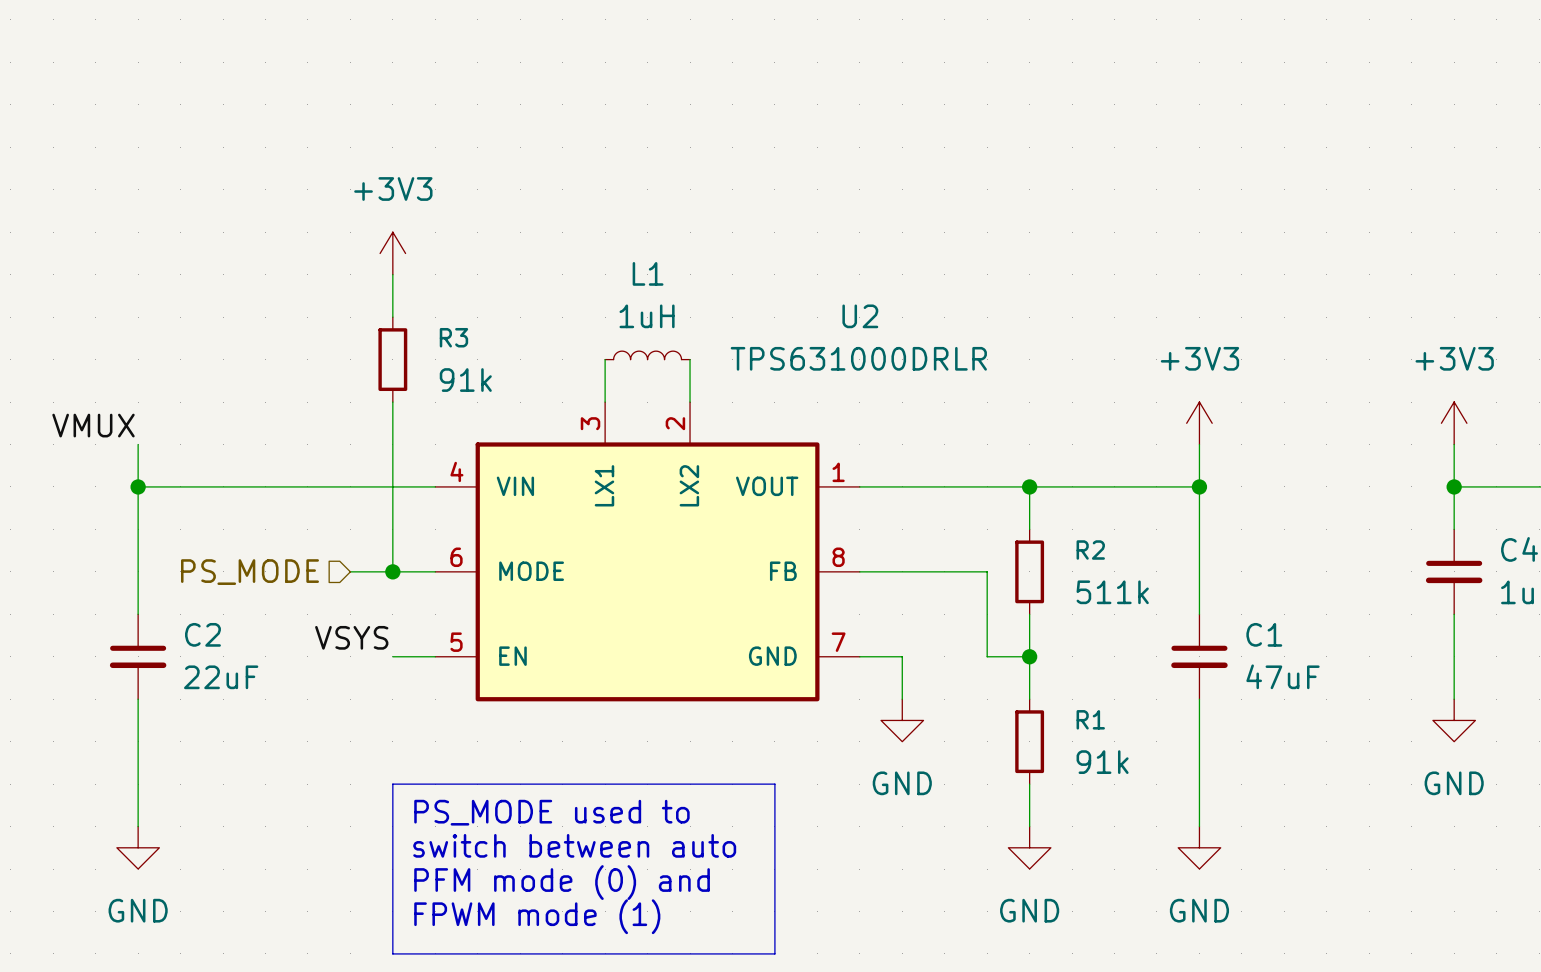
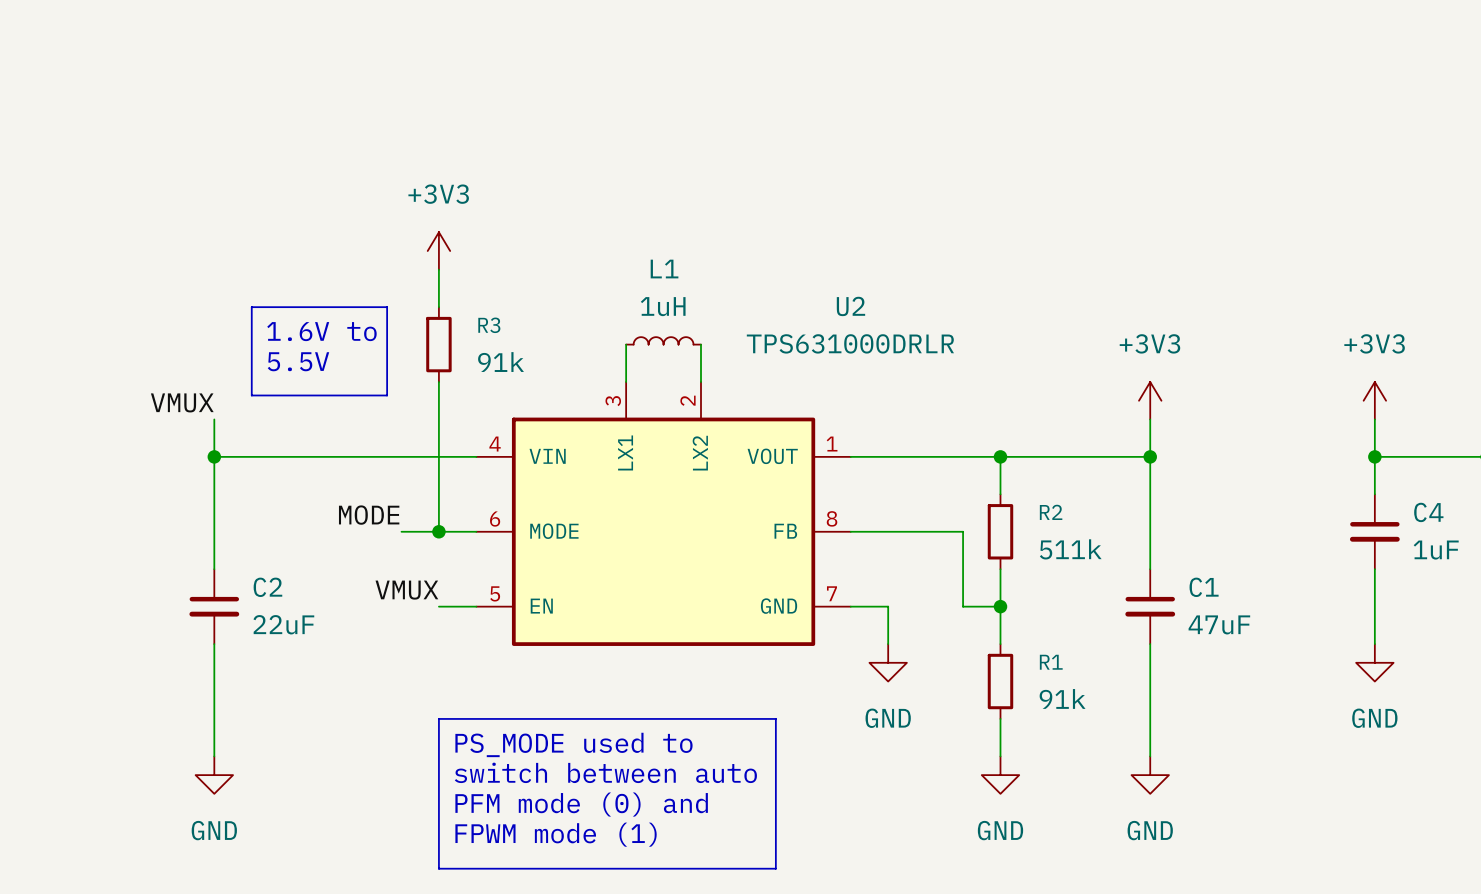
line: none -> (251, 307) (387, 307) (387, 395) (251, 395) (251, 307)
text: none -> 1.6V to (321, 331)
text: none -> 5.5V (298, 361)
label: none -> MODE (369, 515)
hierarchical label: PS_MODE (249, 572) -> none
label: VSYS (351, 637) -> VMUX (406, 590)

